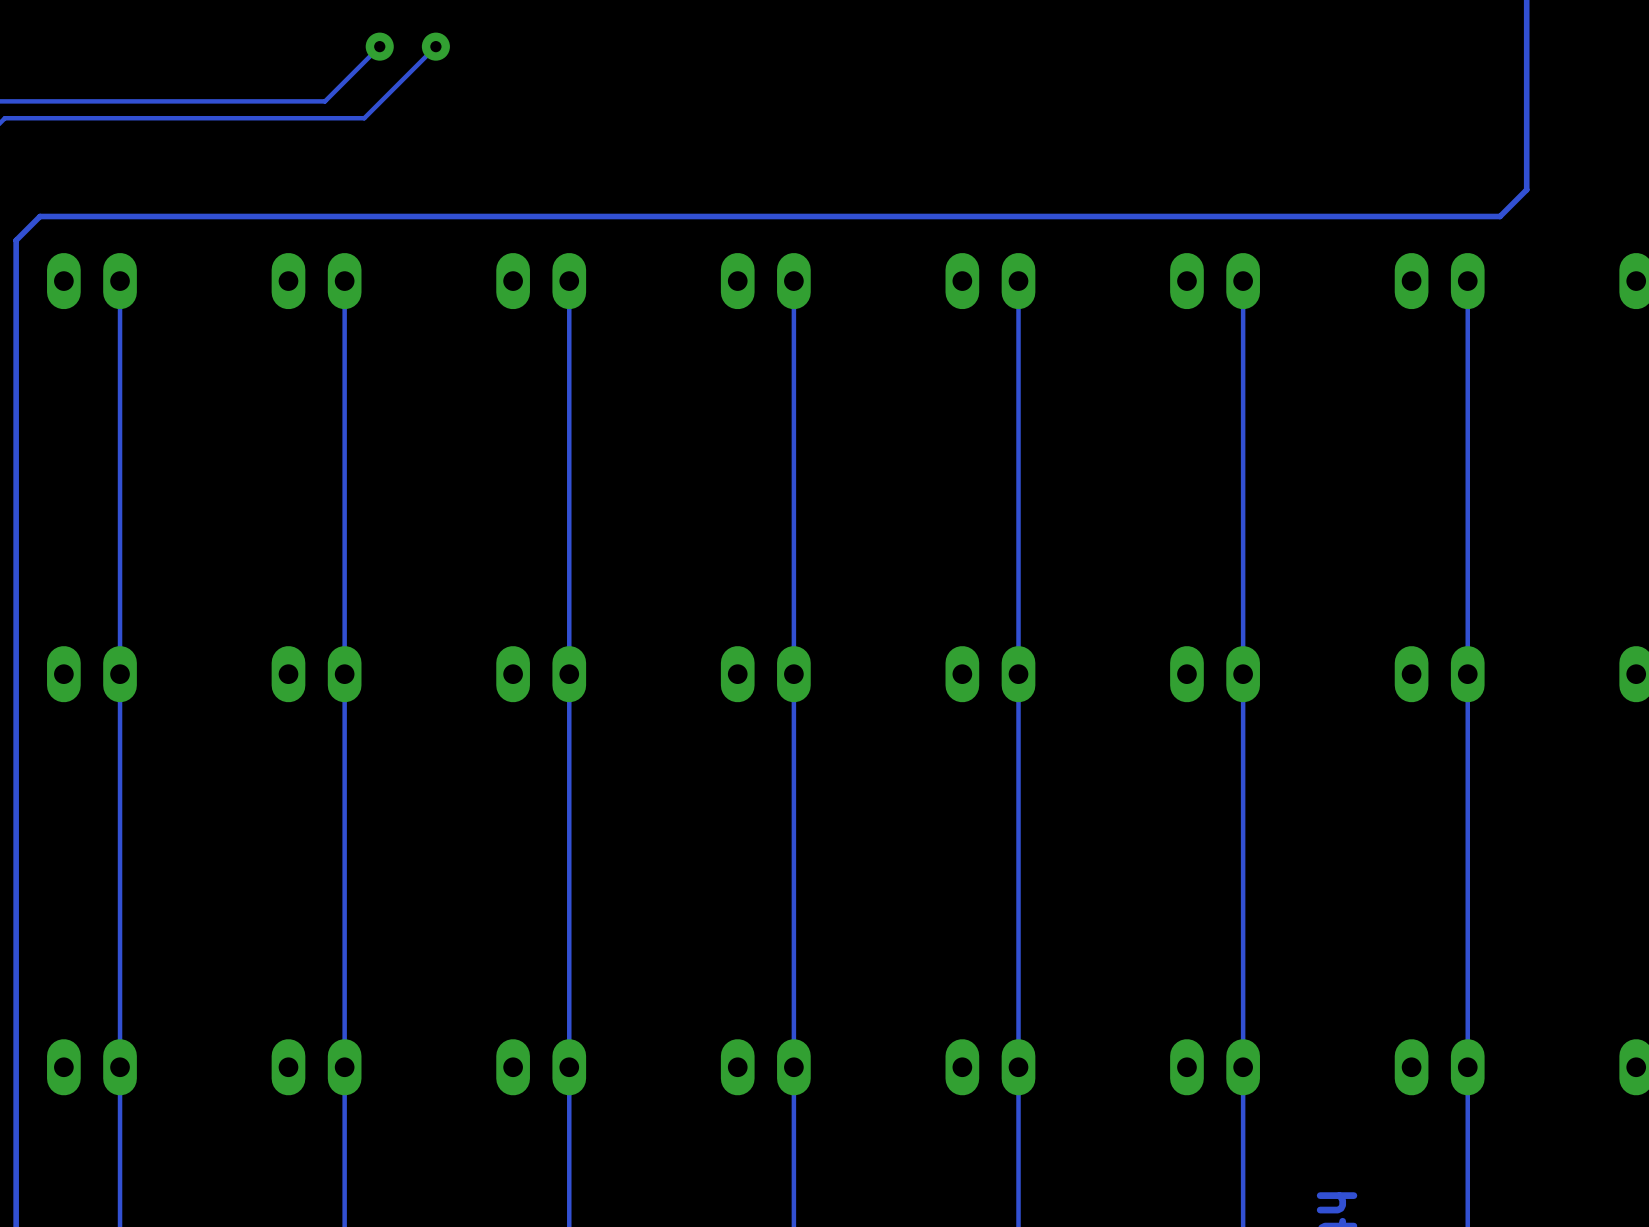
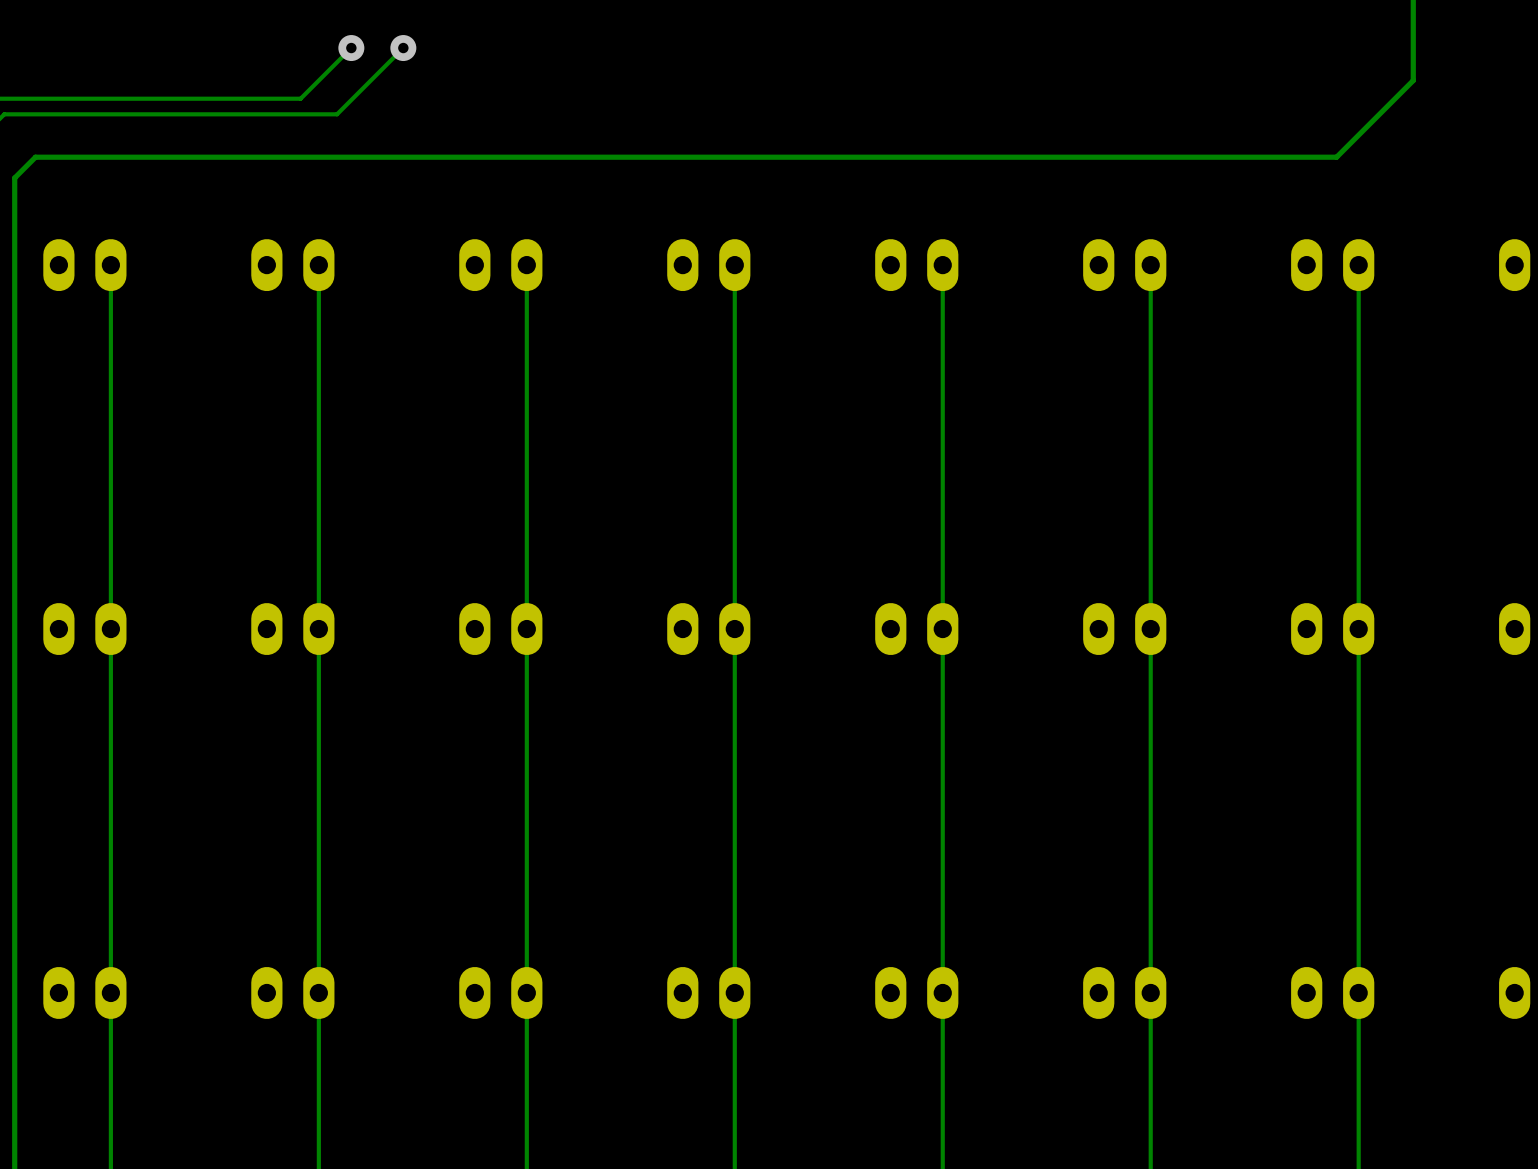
track: (1526, 81) (1526, 189) (1500, 216) (40, 216) (16, 240) -> (1413, 80) (1336, 157) (35, 157) (14, 178) (14, 227)

